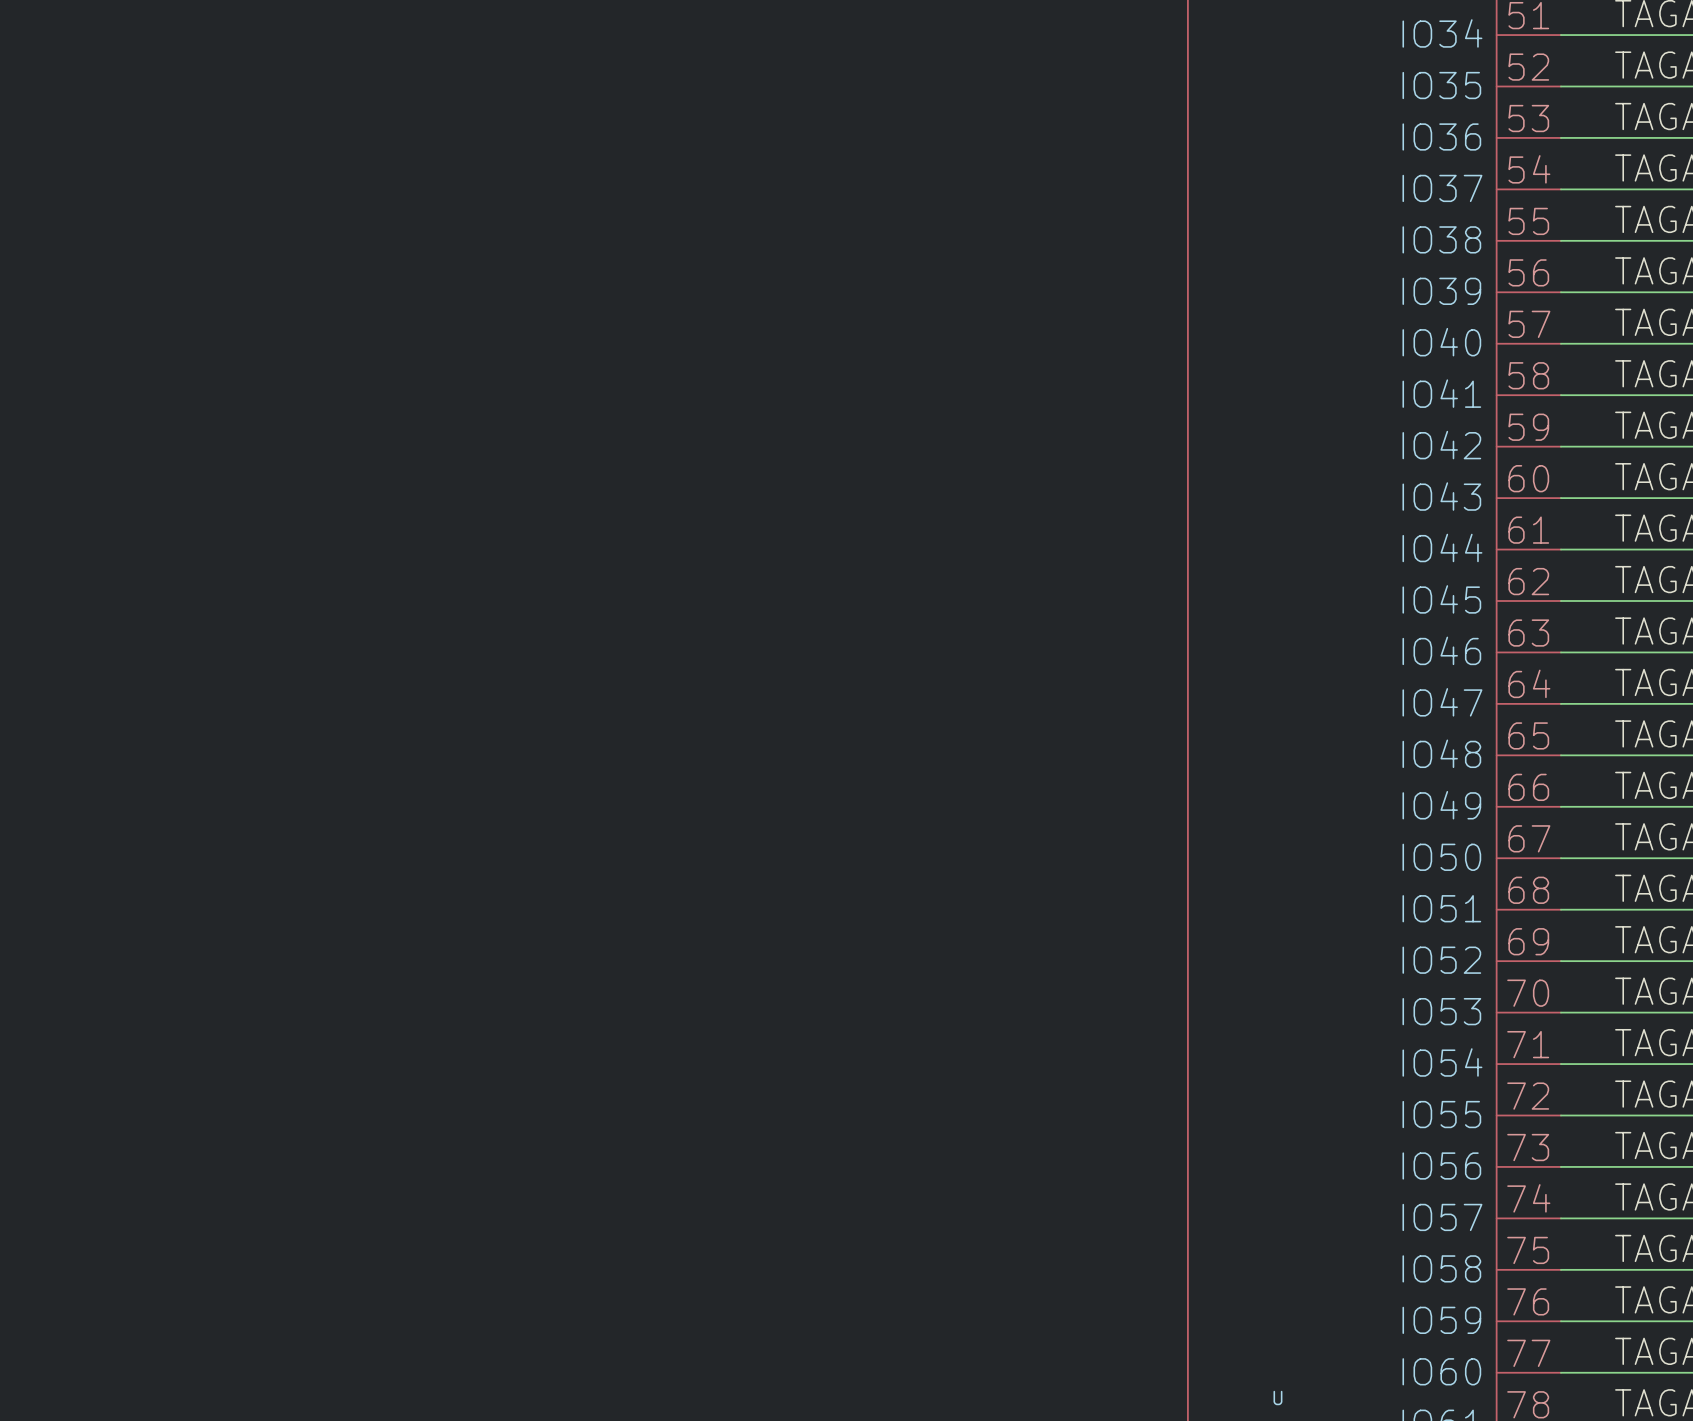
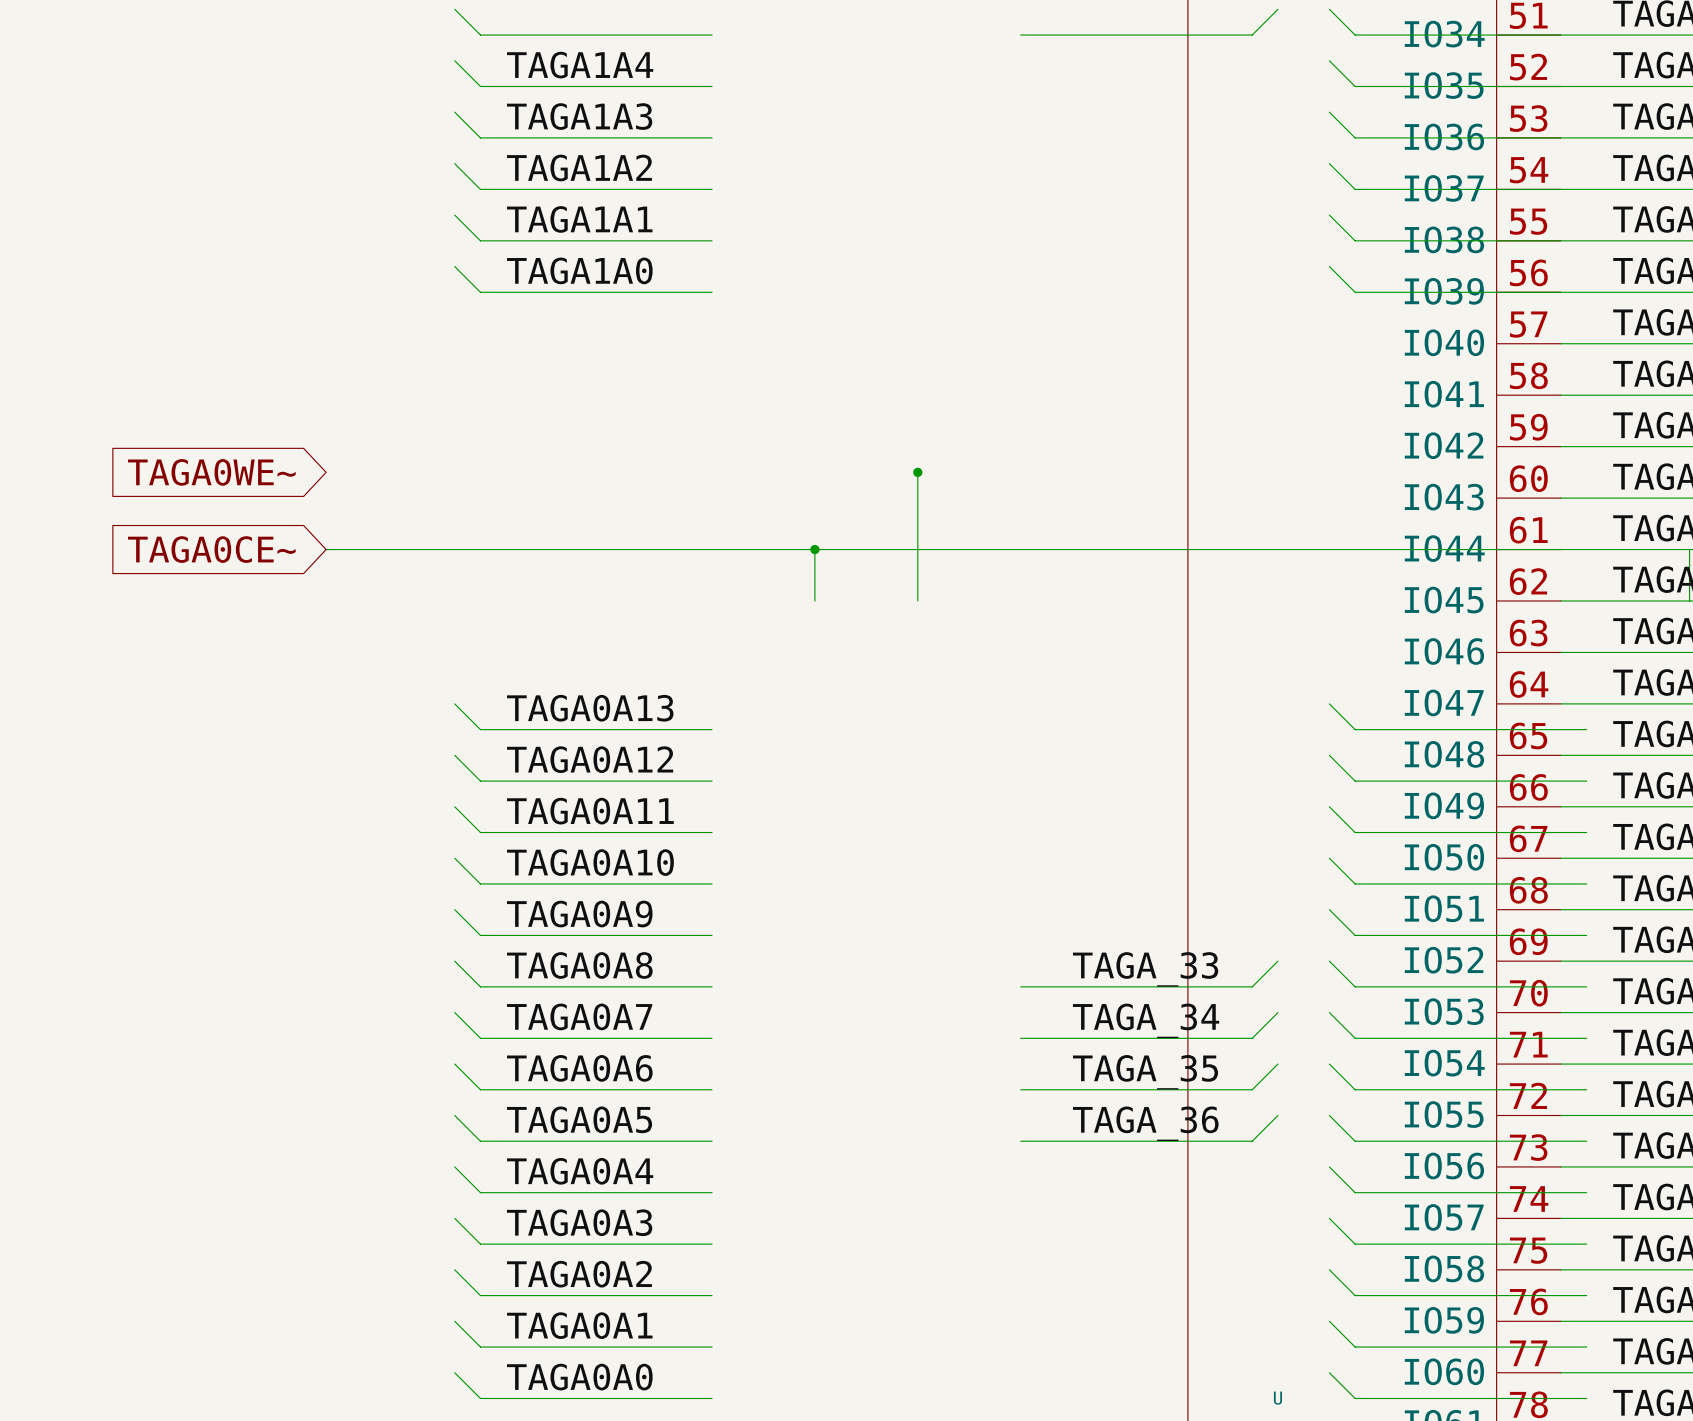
wire: none -> (454, 9) (480, 35) (712, 35)
wire: none -> (1277, 9) (1252, 35) (1020, 35)
wire: none -> (1329, 9) (1355, 35) (1560, 35)
wire: none -> (454, 60) (480, 86) (712, 86)
wire: none -> (1329, 60) (1355, 86) (1560, 86)
label: none -> TAGA1A4 (580, 65)
wire: none -> (454, 112) (480, 137) (712, 137)
wire: none -> (1329, 112) (1355, 137) (1560, 137)
label: none -> TAGA1A3 (579, 116)
wire: none -> (454, 163) (480, 189) (712, 189)
wire: none -> (1329, 163) (1355, 189) (1560, 189)
label: none -> TAGA1A2 (579, 167)
wire: none -> (454, 215) (480, 240) (712, 240)
wire: none -> (1329, 215) (1355, 240) (1560, 240)
label: none -> TAGA1A1 (579, 219)
wire: none -> (454, 266) (480, 292) (712, 292)
wire: none -> (1329, 266) (1355, 292) (1560, 292)
label: none -> TAGA1A0 (579, 270)
global label: none -> TAGA0WE~ (211, 472)
wire: none -> (917, 472) (917, 600)
junction: none -> (917, 472)
global label: none -> TAGA0CE~ (211, 549)
wire: none -> (326, 549) (1560, 549)
wire: none -> (814, 549) (814, 600)
junction: none -> (814, 549)
wire: none -> (1689, 549) (1689, 600)
wire: none -> (454, 703) (480, 729) (712, 729)
wire: none -> (1329, 703) (1355, 729) (1586, 729)
label: none -> TAGA0A13 (590, 708)
wire: none -> (454, 755) (480, 781) (712, 781)
wire: none -> (1329, 755) (1355, 781) (1586, 781)
label: none -> TAGA0A12 (590, 759)
wire: none -> (454, 806) (480, 832) (712, 832)
wire: none -> (1329, 806) (1355, 832) (1586, 832)
label: none -> TAGA0A11 (590, 811)
wire: none -> (454, 858) (480, 883) (712, 883)
wire: none -> (1329, 858) (1355, 883) (1586, 883)
label: none -> TAGA0A10 (590, 862)
wire: none -> (454, 909) (480, 935) (712, 935)
wire: none -> (1329, 909) (1355, 935) (1586, 935)
label: none -> TAGA0A9 (579, 914)
wire: none -> (454, 961) (480, 986) (712, 986)
wire: none -> (1277, 961) (1252, 986) (1020, 986)
wire: none -> (1329, 961) (1355, 986) (1586, 986)
label: none -> TAGA0A8 (579, 965)
label: none -> TAGA_33 (1145, 969)
wire: none -> (454, 1012) (480, 1038) (712, 1038)
wire: none -> (1277, 1012) (1252, 1038) (1020, 1038)
wire: none -> (1329, 1012) (1355, 1038) (1586, 1038)
label: none -> TAGA0A7 (579, 1016)
label: none -> TAGA_34 (1146, 1020)
wire: none -> (454, 1064) (480, 1089) (712, 1089)
wire: none -> (1277, 1064) (1252, 1089) (1020, 1089)
wire: none -> (1329, 1064) (1355, 1089) (1586, 1089)
label: none -> TAGA0A6 (579, 1068)
label: none -> TAGA_35 (1145, 1072)
wire: none -> (454, 1115) (480, 1141) (712, 1141)
wire: none -> (1277, 1115) (1252, 1141) (1020, 1141)
wire: none -> (1329, 1115) (1355, 1141) (1586, 1141)
label: none -> TAGA0A5 (579, 1119)
label: none -> TAGA_36 (1145, 1123)
wire: none -> (454, 1166) (480, 1192) (712, 1192)
wire: none -> (1329, 1166) (1355, 1192) (1586, 1192)
label: none -> TAGA0A4 (580, 1171)
wire: none -> (454, 1218) (480, 1244) (712, 1244)
wire: none -> (1329, 1218) (1355, 1244) (1586, 1244)
label: none -> TAGA0A3 (579, 1222)
wire: none -> (454, 1269) (480, 1295) (712, 1295)
wire: none -> (1329, 1269) (1355, 1295) (1586, 1295)
label: none -> TAGA0A2 (579, 1274)
wire: none -> (454, 1321) (480, 1347) (712, 1347)
wire: none -> (1329, 1321) (1355, 1347) (1586, 1347)
label: none -> TAGA0A1 (579, 1325)
wire: none -> (454, 1372) (480, 1398) (712, 1398)
wire: none -> (1329, 1372) (1355, 1398) (1586, 1398)
label: none -> TAGA0A0 (579, 1377)

